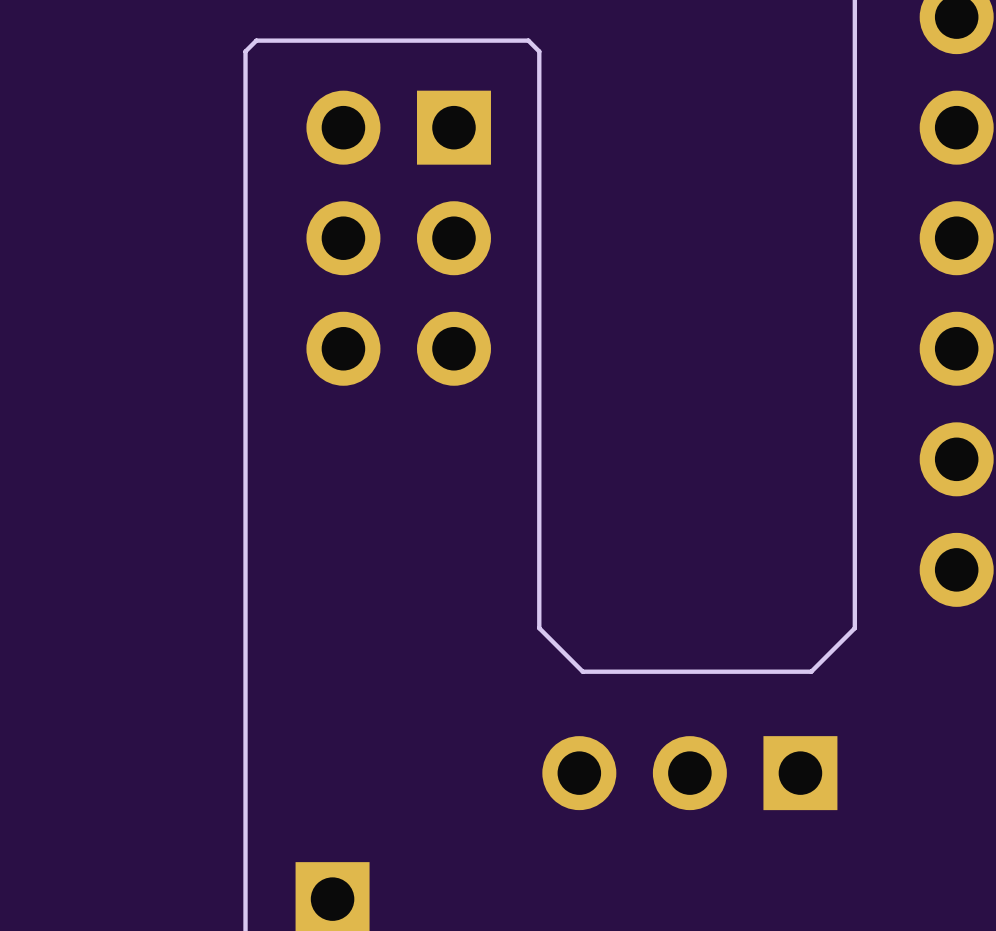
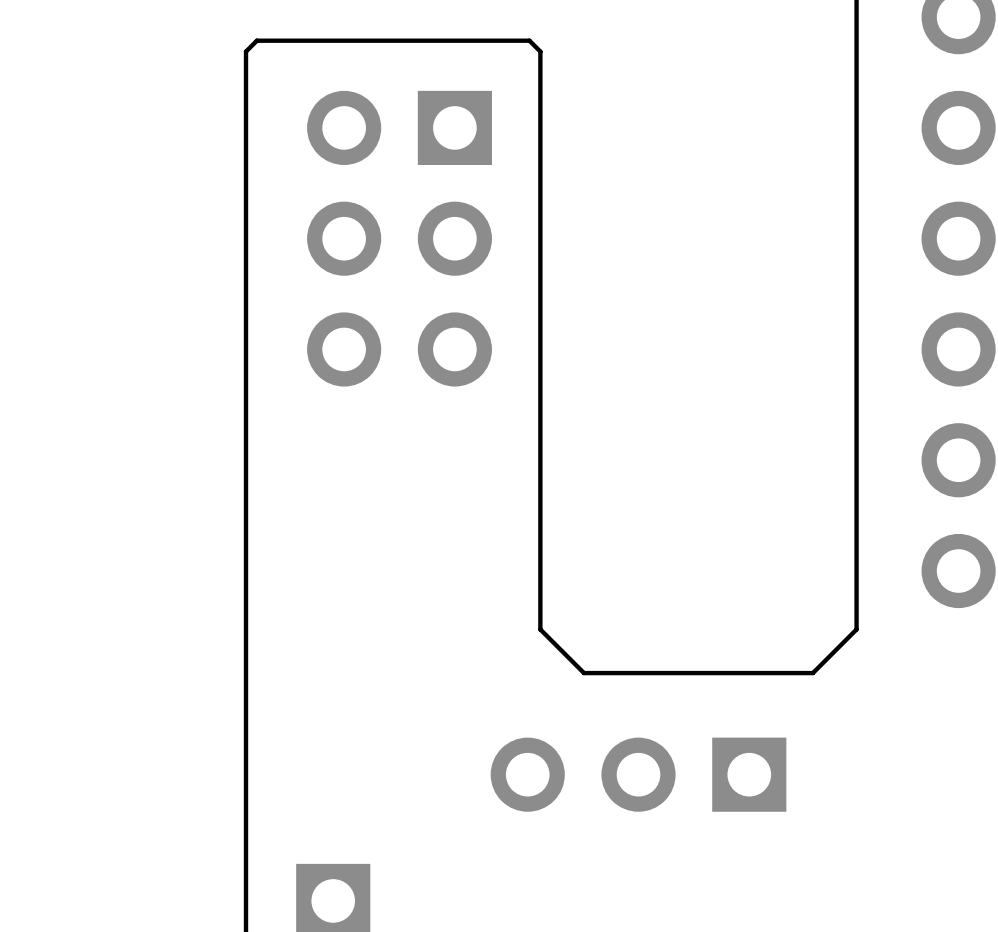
part position: (689, 773) -> (638, 774)

